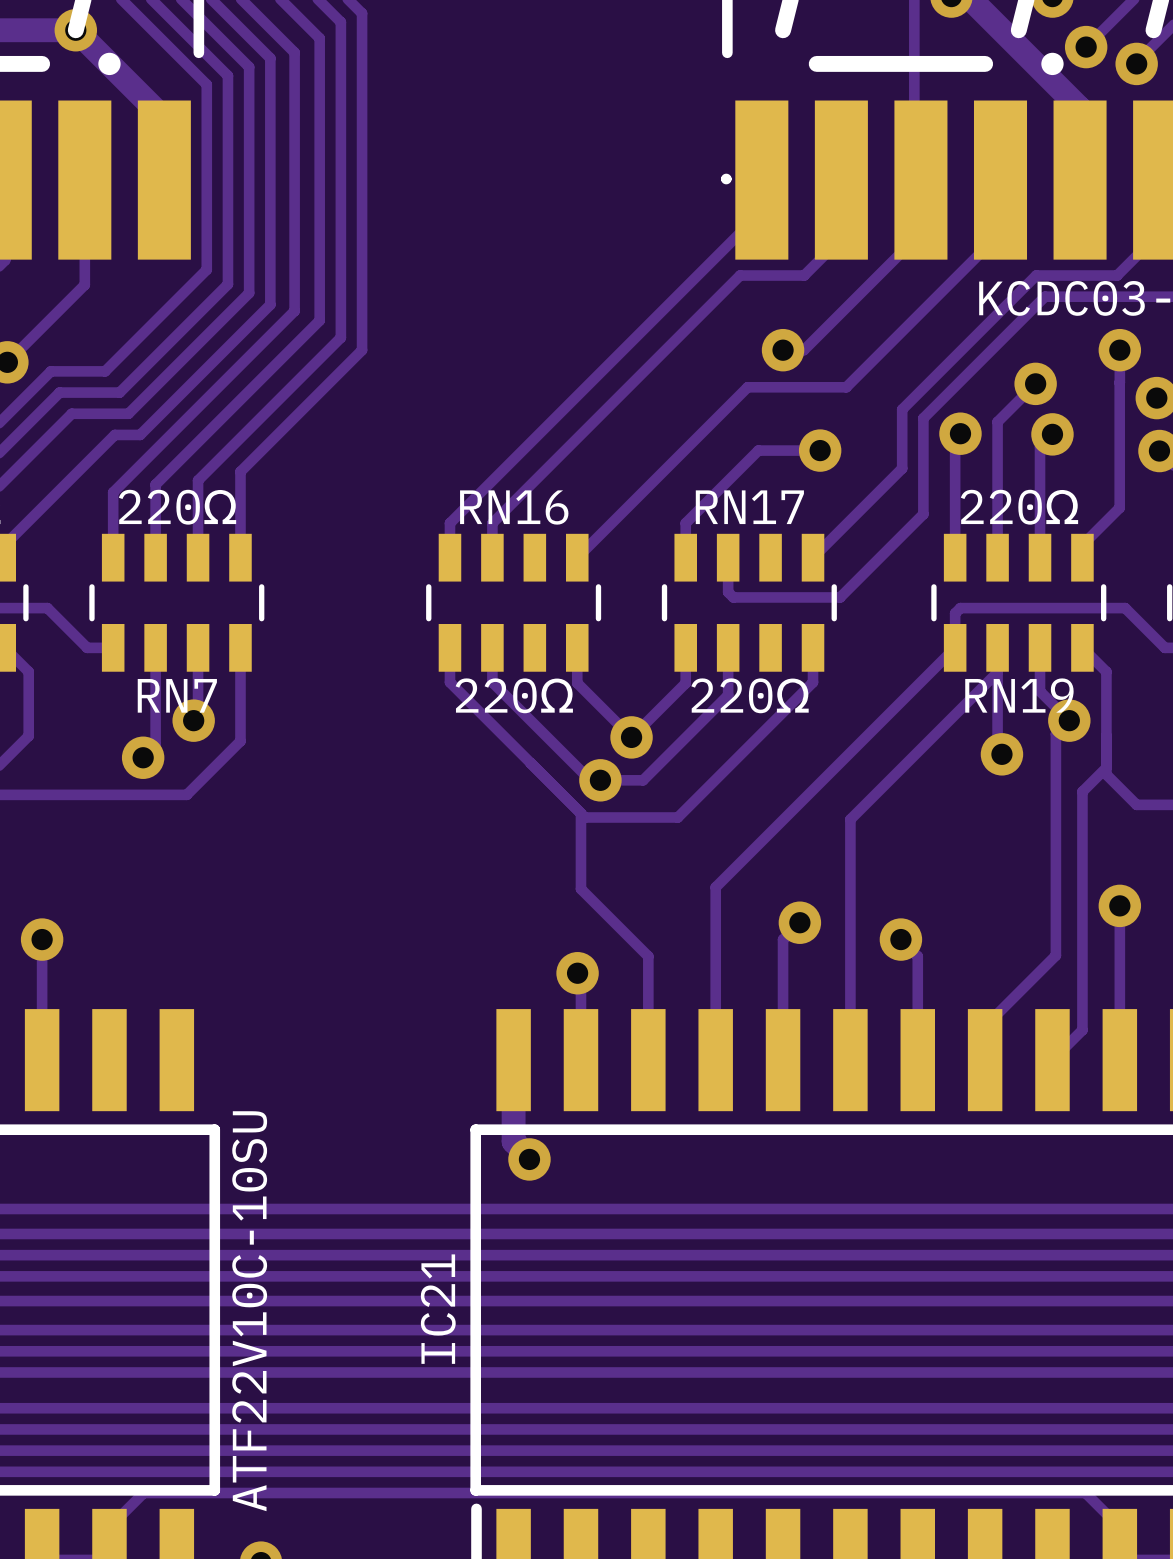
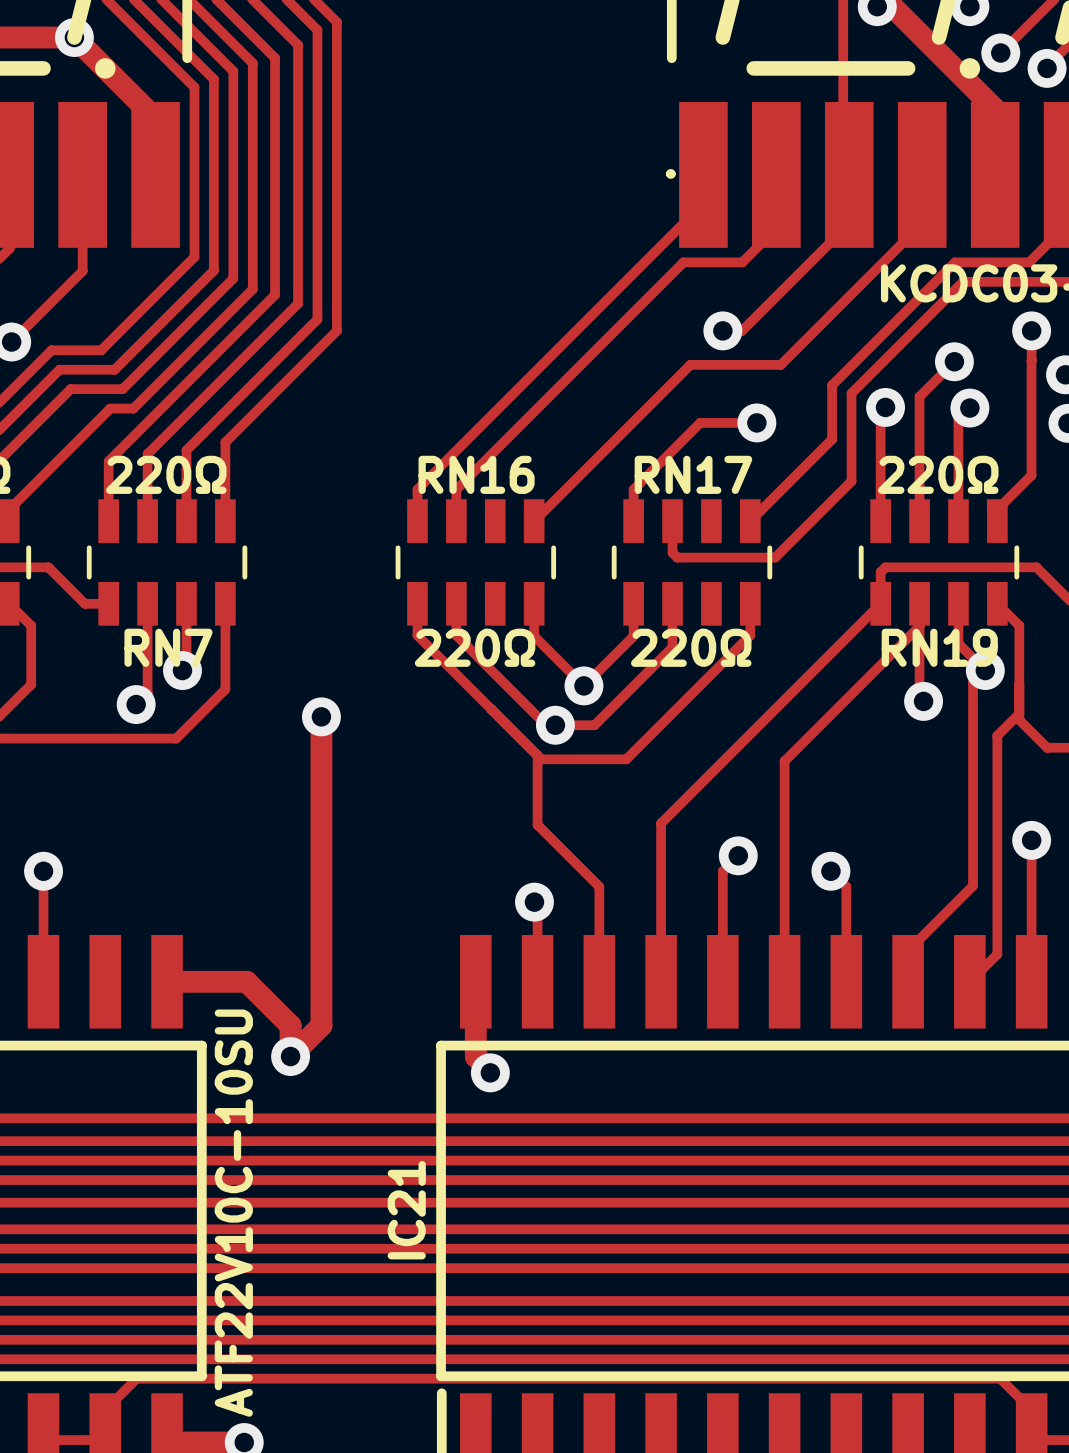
track: none -> (321, 716) (321, 1025) (290, 1056) (290, 1025) (246, 981) (167, 981)
via: none -> (321, 716)
via: none -> (290, 1056)

